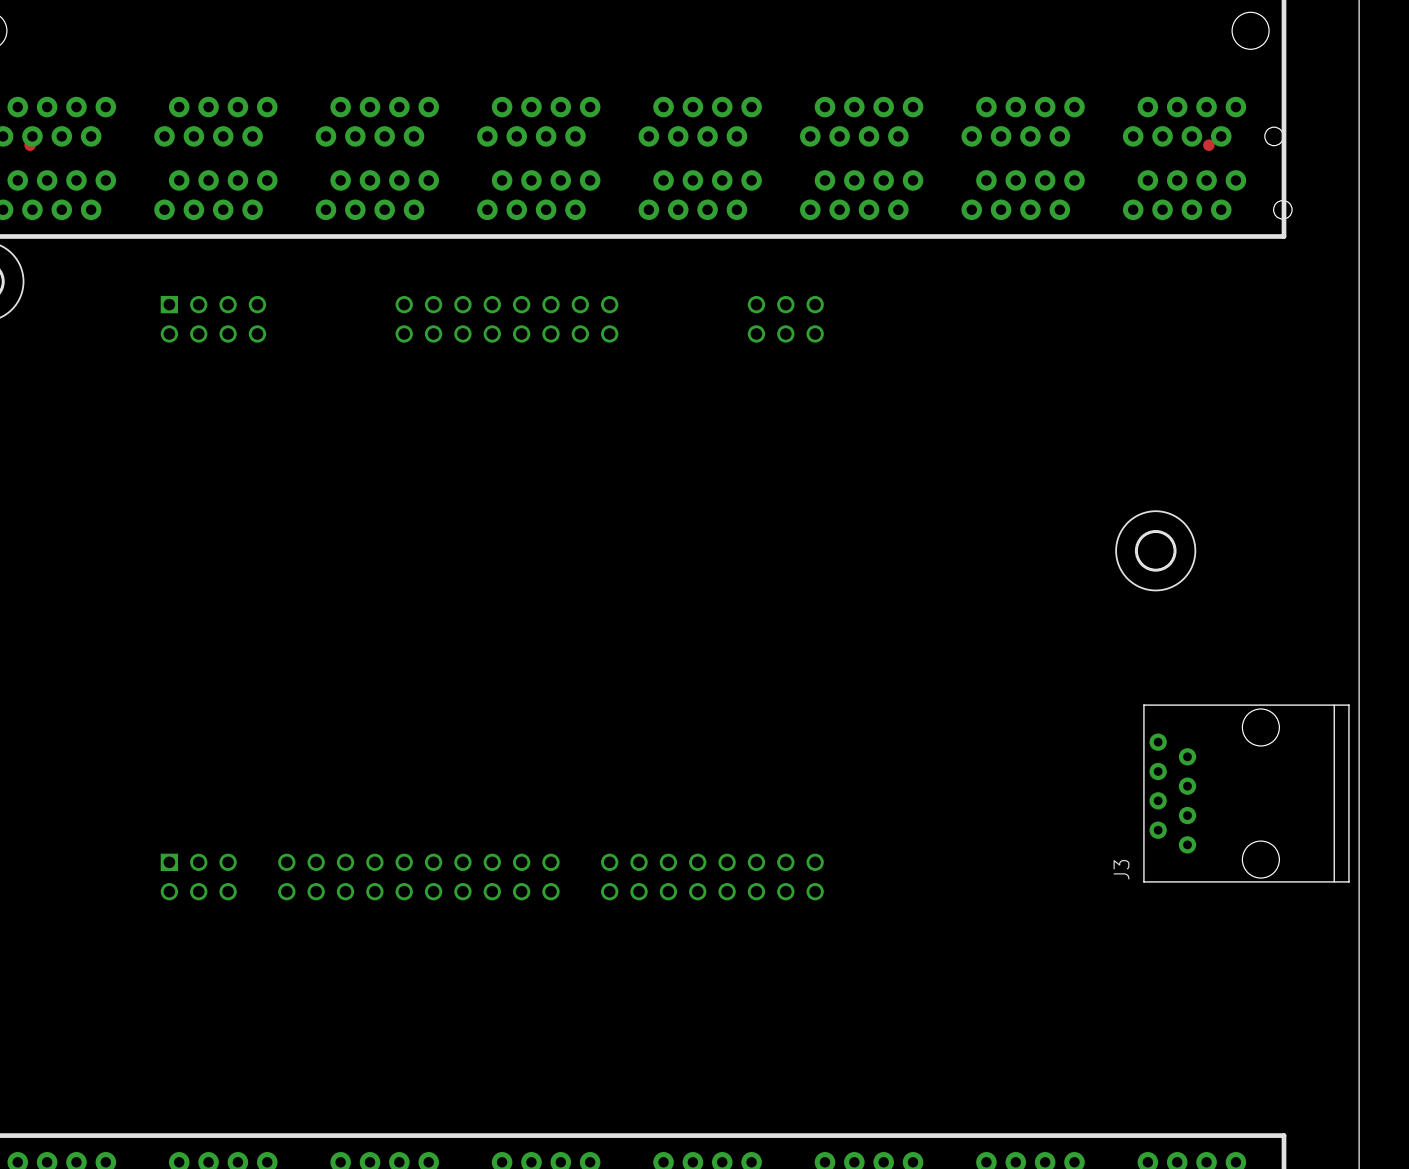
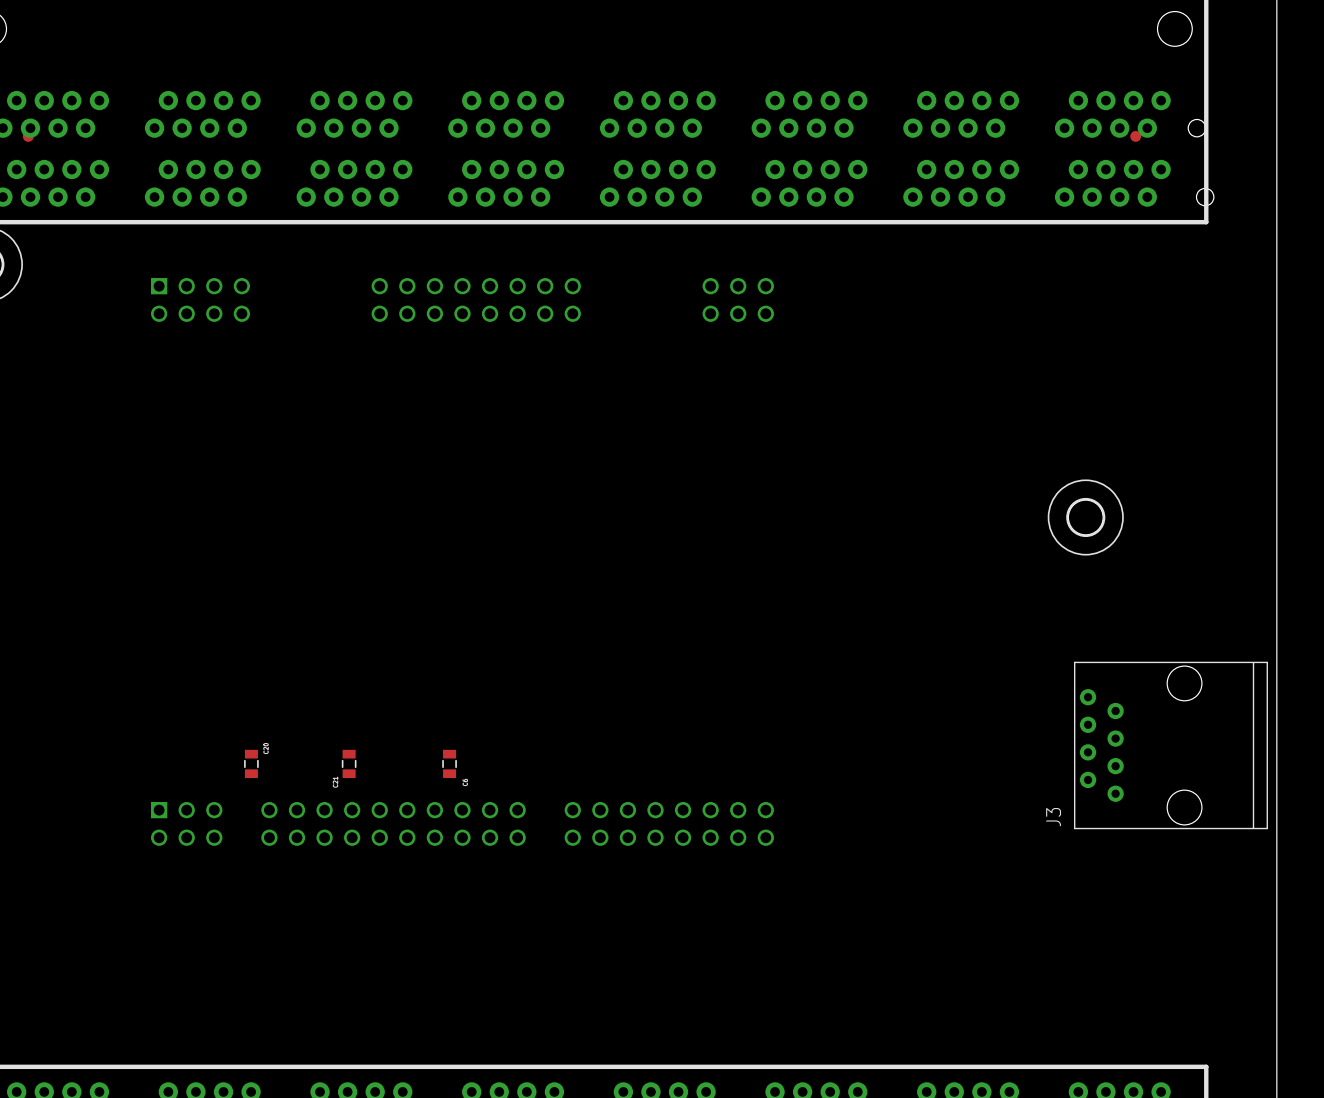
part: none -> (251, 763)
part: none -> (349, 763)
part: none -> (449, 763)

